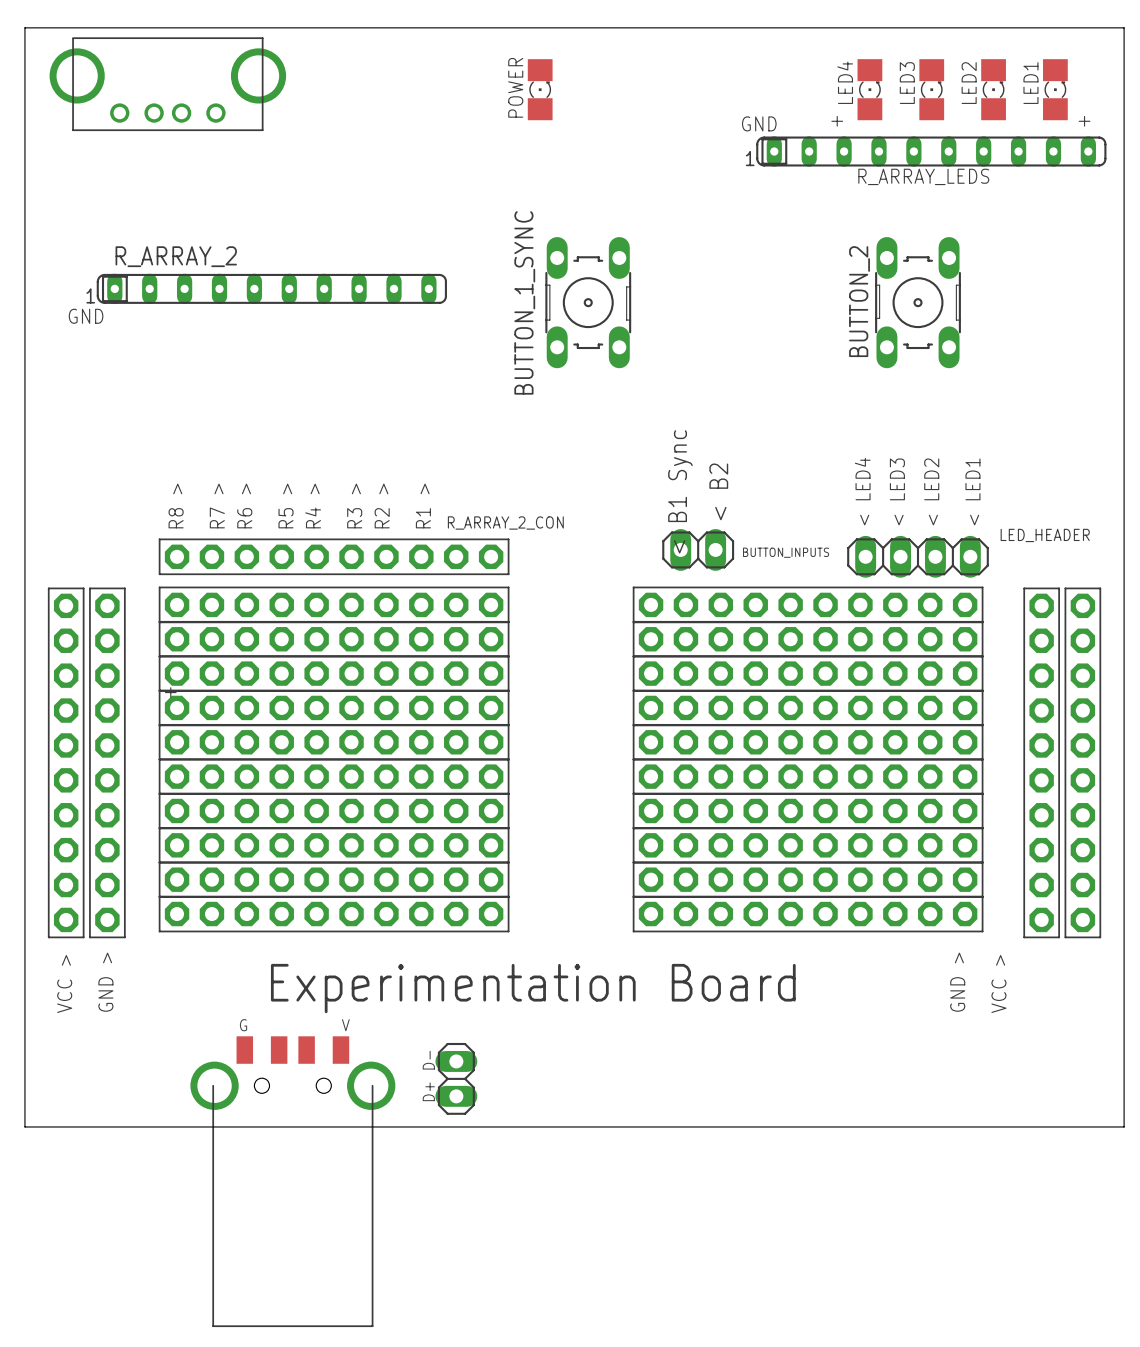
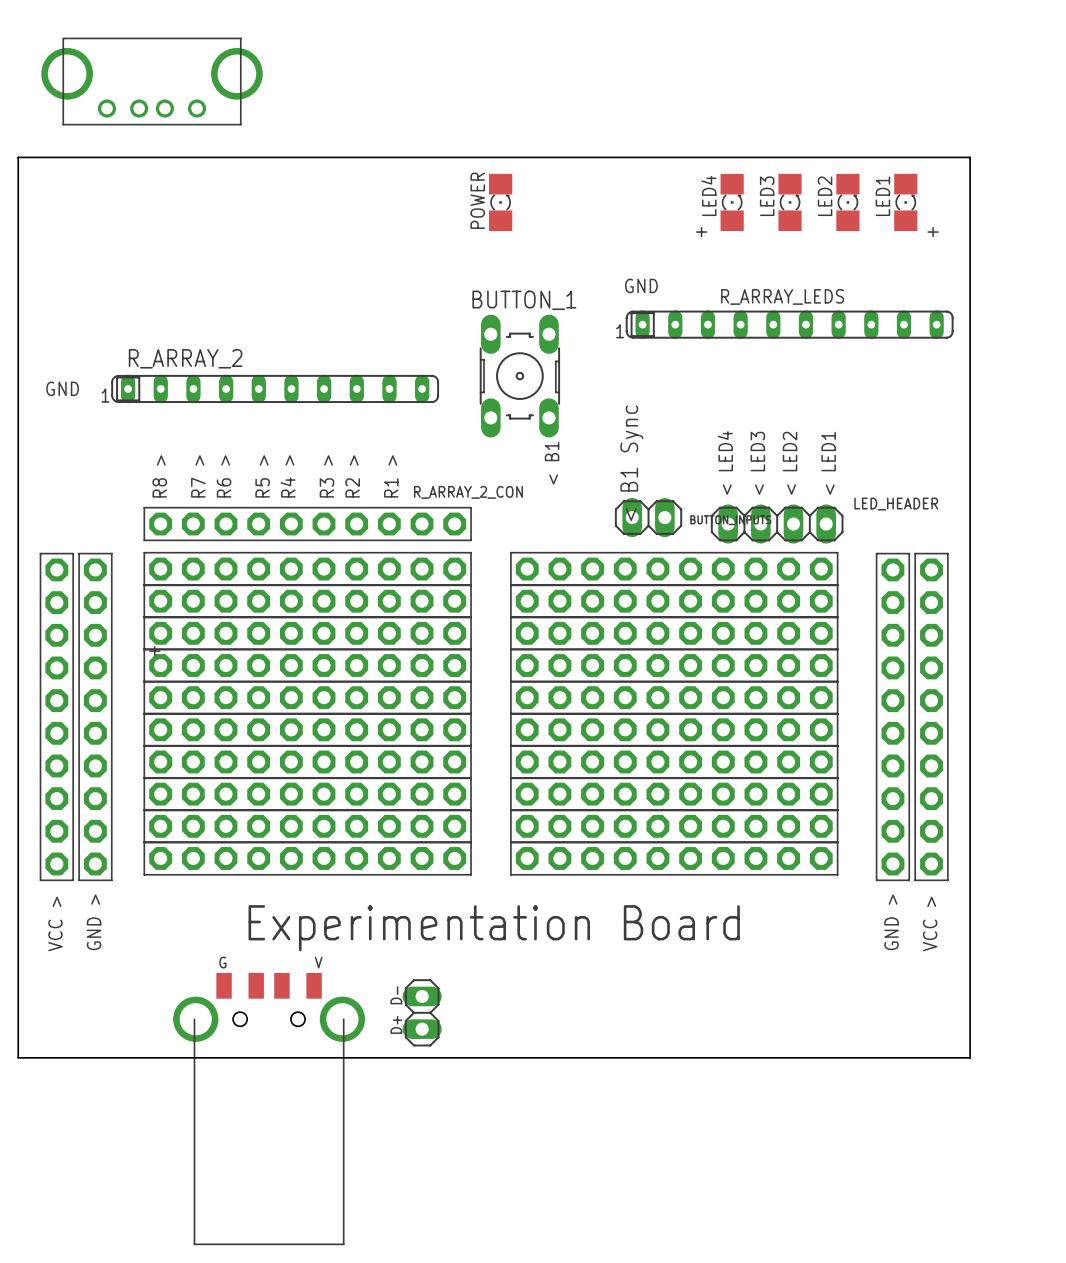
POWER position: (540, 89) -> (500, 202)
LED4 position: (869, 89) -> (732, 202)
LED3 position: (931, 89) -> (790, 202)
LED2 position: (993, 89) -> (847, 202)
LED1 position: (1055, 89) -> (905, 202)
text: + (837, 121) -> none
text: + (1084, 121) -> none
text position: GND (759, 123) -> GND (641, 285)
part position: (931, 151) -> (789, 324)
board edge: (24, 165) (24, 27) (1124, 27) (1124, 1126) (1041, 1126) -> (18, 157) (970, 157) (970, 1057)
text position: R_ARRAY_LEDS (923, 176) -> R_ARRAY_LEDS (782, 296)
text: none -> + (701, 232)
text: none -> + (933, 232)
R_ARRAY_2 position: (271, 288) -> (275, 388)
BUTTON_1_SYNC: (588, 302) -> none
BUTTON_2: (918, 302) -> none
text position: GND (86, 316) -> GND (62, 388)
BUTTON_1: none -> (519, 376)
text: none -> < B1 (552, 463)
text: < B2 (718, 491) -> none
text position: < LED4 (862, 491) -> < LED4 (725, 463)
text position: < LED3 (897, 491) -> < LED3 (757, 463)
text position: < LED2 (931, 491) -> < LED2 (790, 463)
text position: < LED1 (972, 491) -> < LED1 (828, 463)
LED_HEADER position: (918, 556) -> (777, 524)
part: none -> (674, 569)
part: (808, 604) -> none
part: none -> (674, 601)
part: (808, 639) -> none
part: none -> (674, 633)
part: (808, 673) -> none
part: none -> (674, 665)
part: (808, 707) -> none
part: none -> (674, 697)
part: (808, 742) -> none
part: none -> (892, 716)
part: none -> (931, 716)
part: (1041, 762) -> none
part: (1082, 762) -> none
part: none -> (674, 729)
part: (808, 776) -> none
part: none -> (674, 761)
part: (808, 810) -> none
part: none -> (674, 794)
part: (808, 845) -> none
part: none -> (674, 826)
part: (808, 879) -> none
part: none -> (674, 858)
part: (808, 914) -> none

